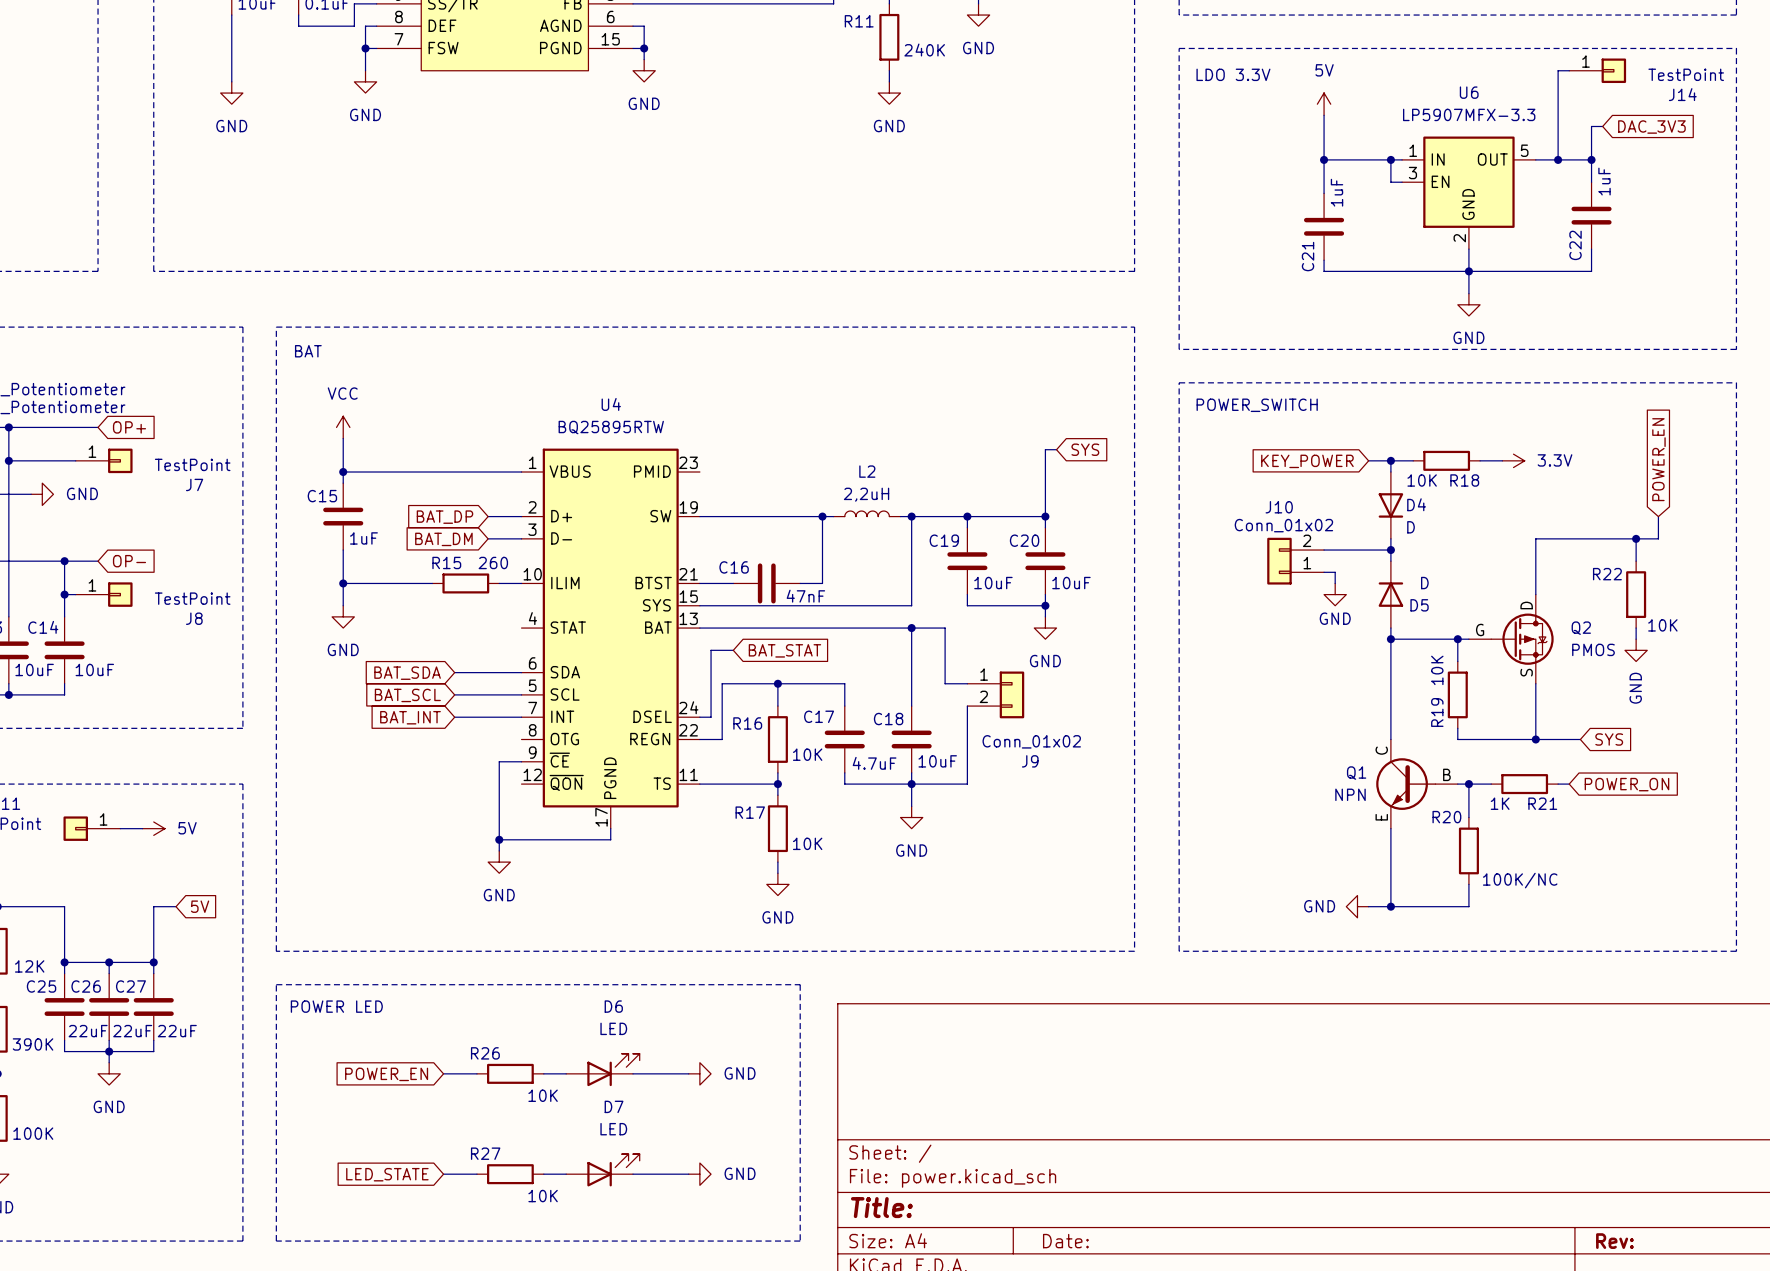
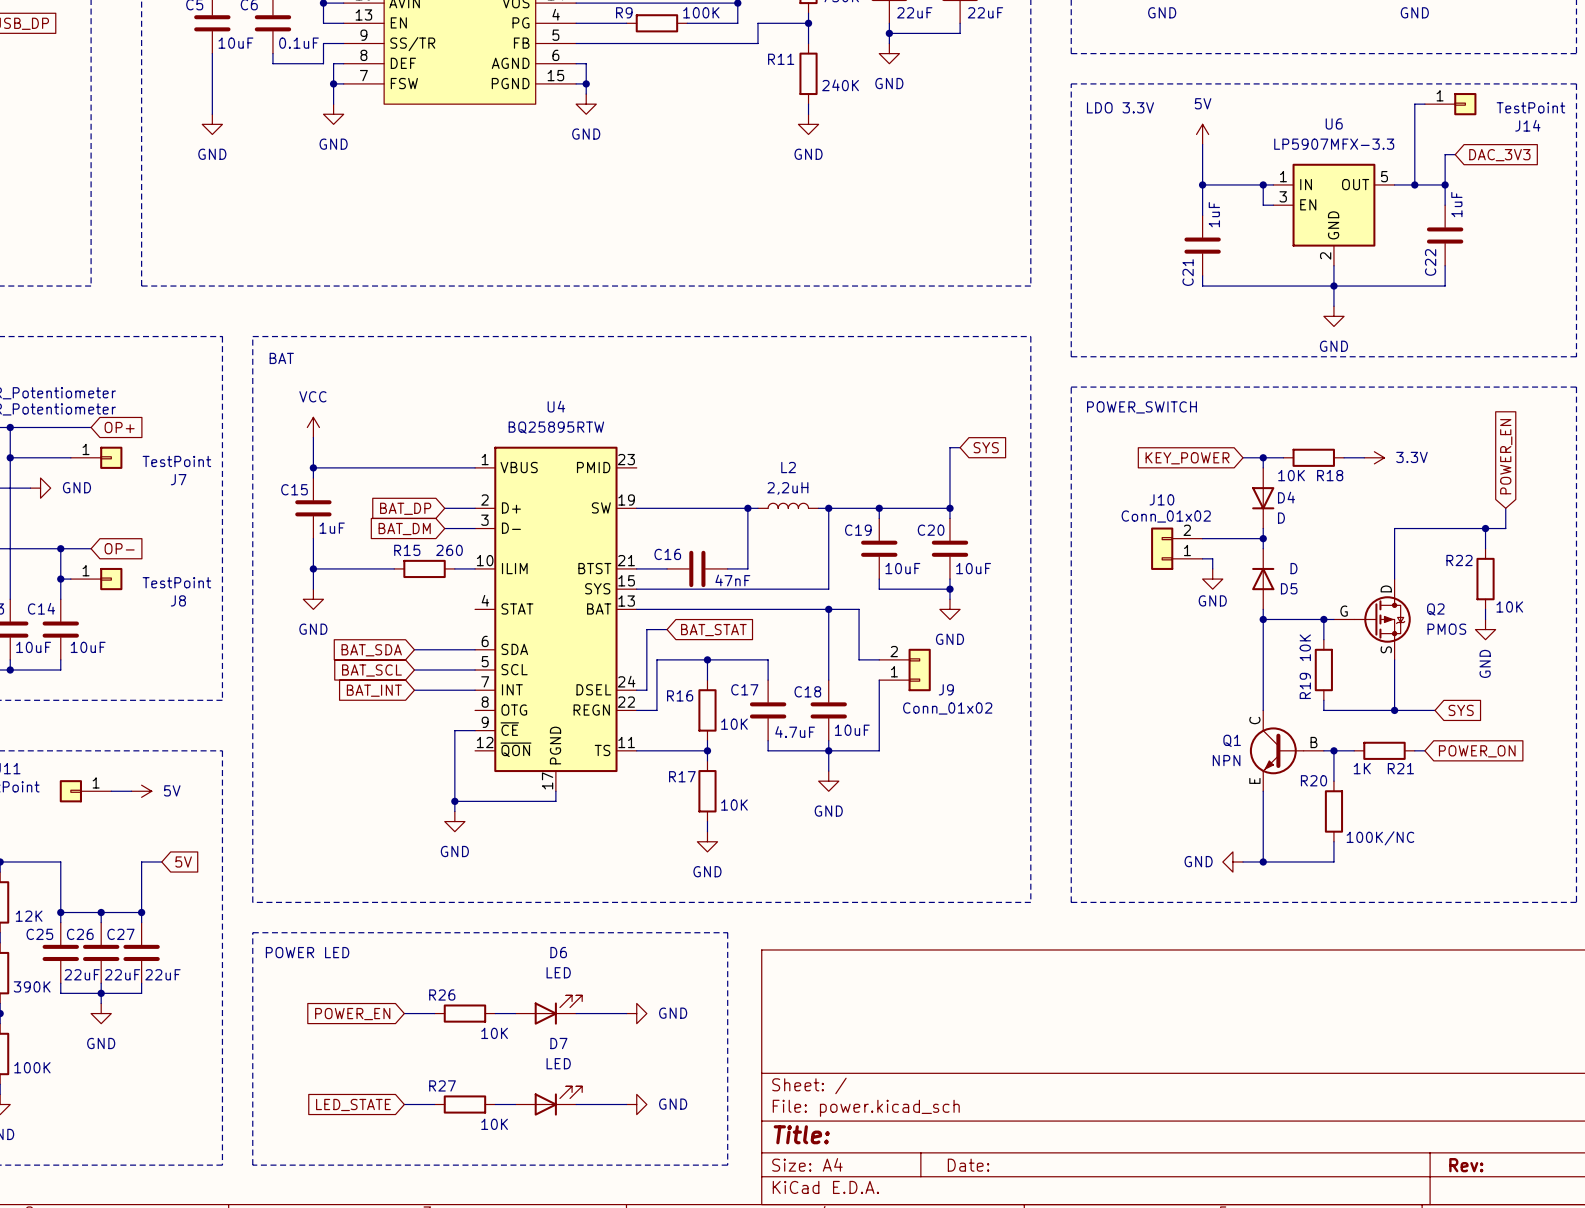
J9 flip: as is (1011, 694) -> up-down (919, 670)
J9 name position: J9 (1030, 761) -> J9 (946, 689)

